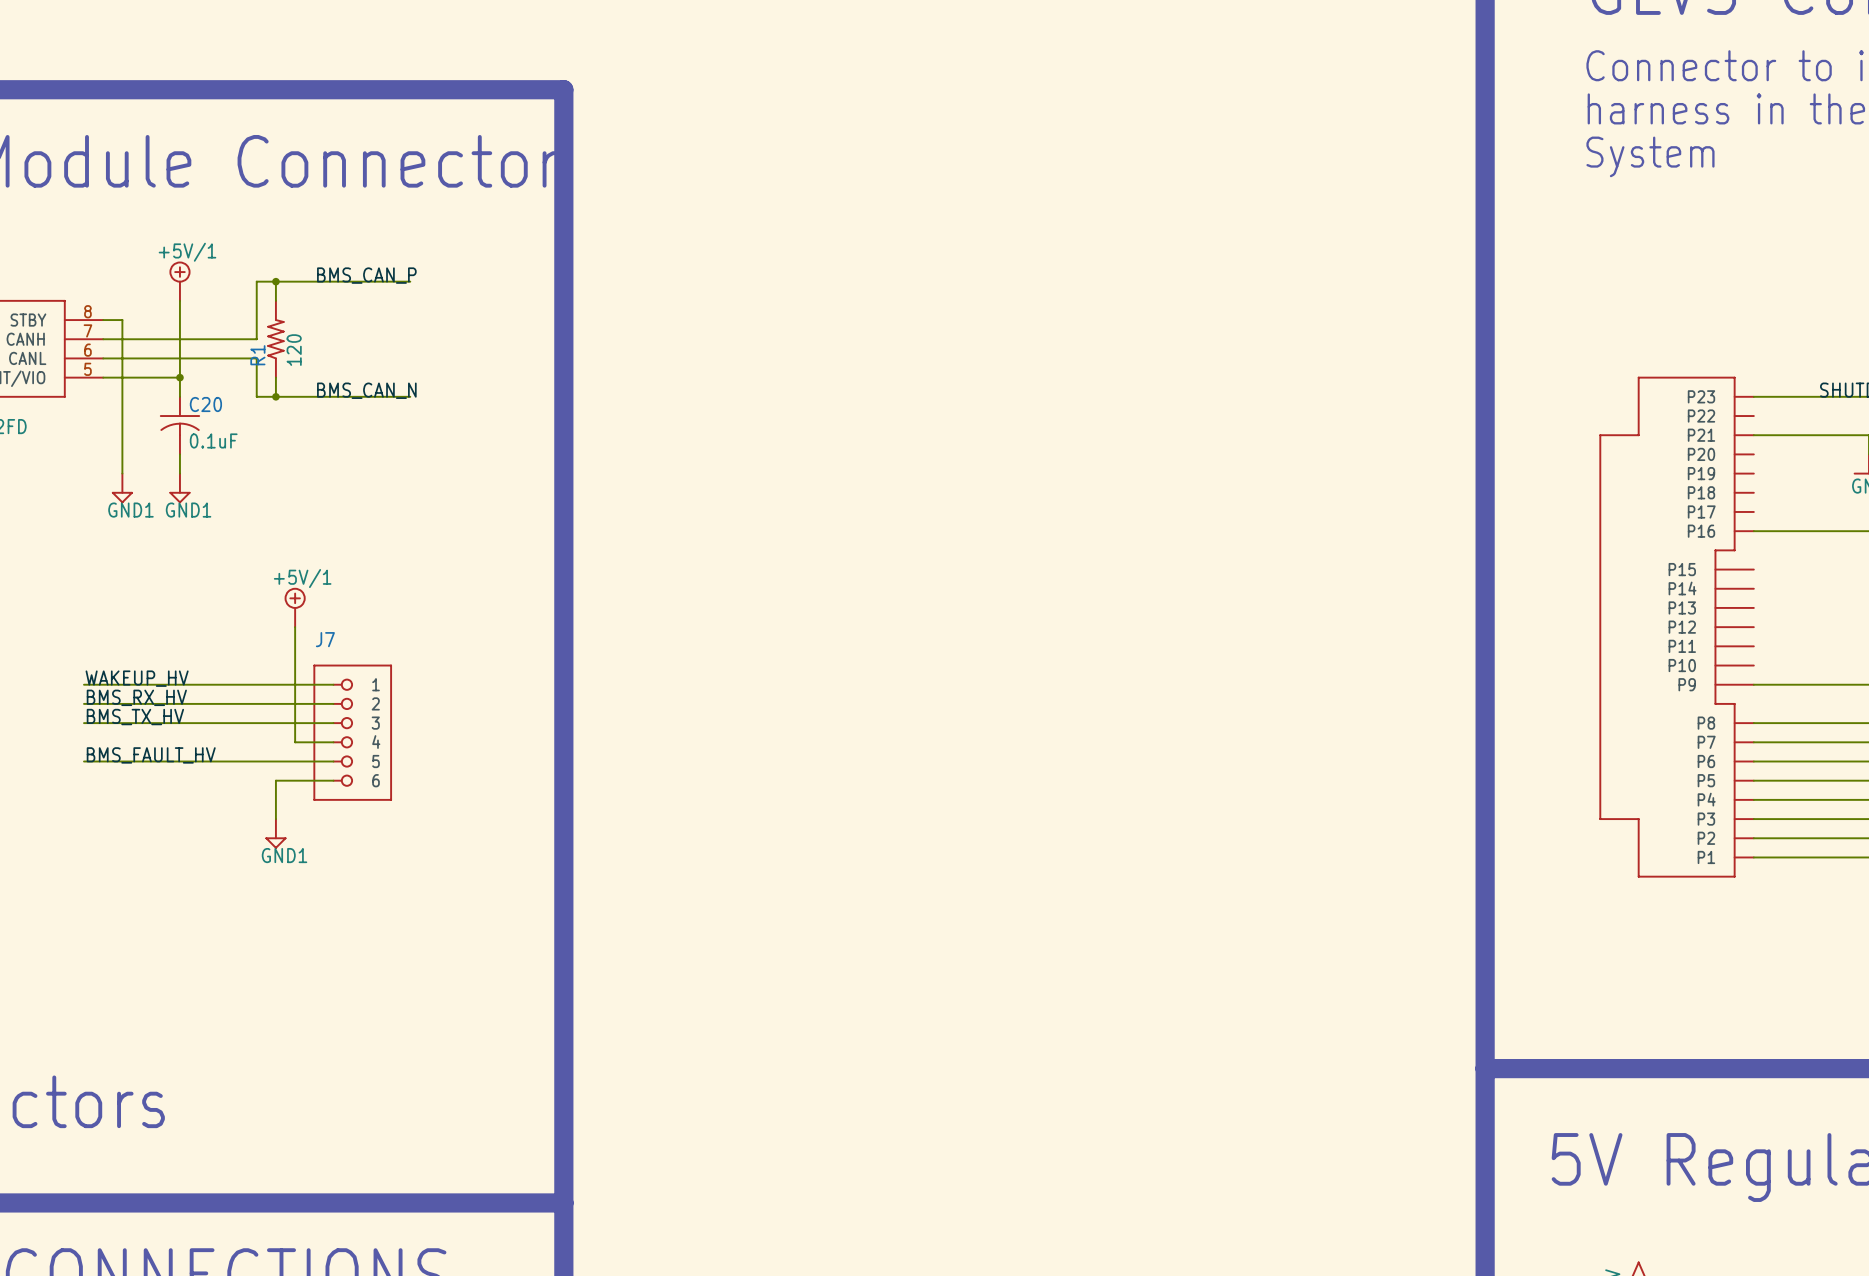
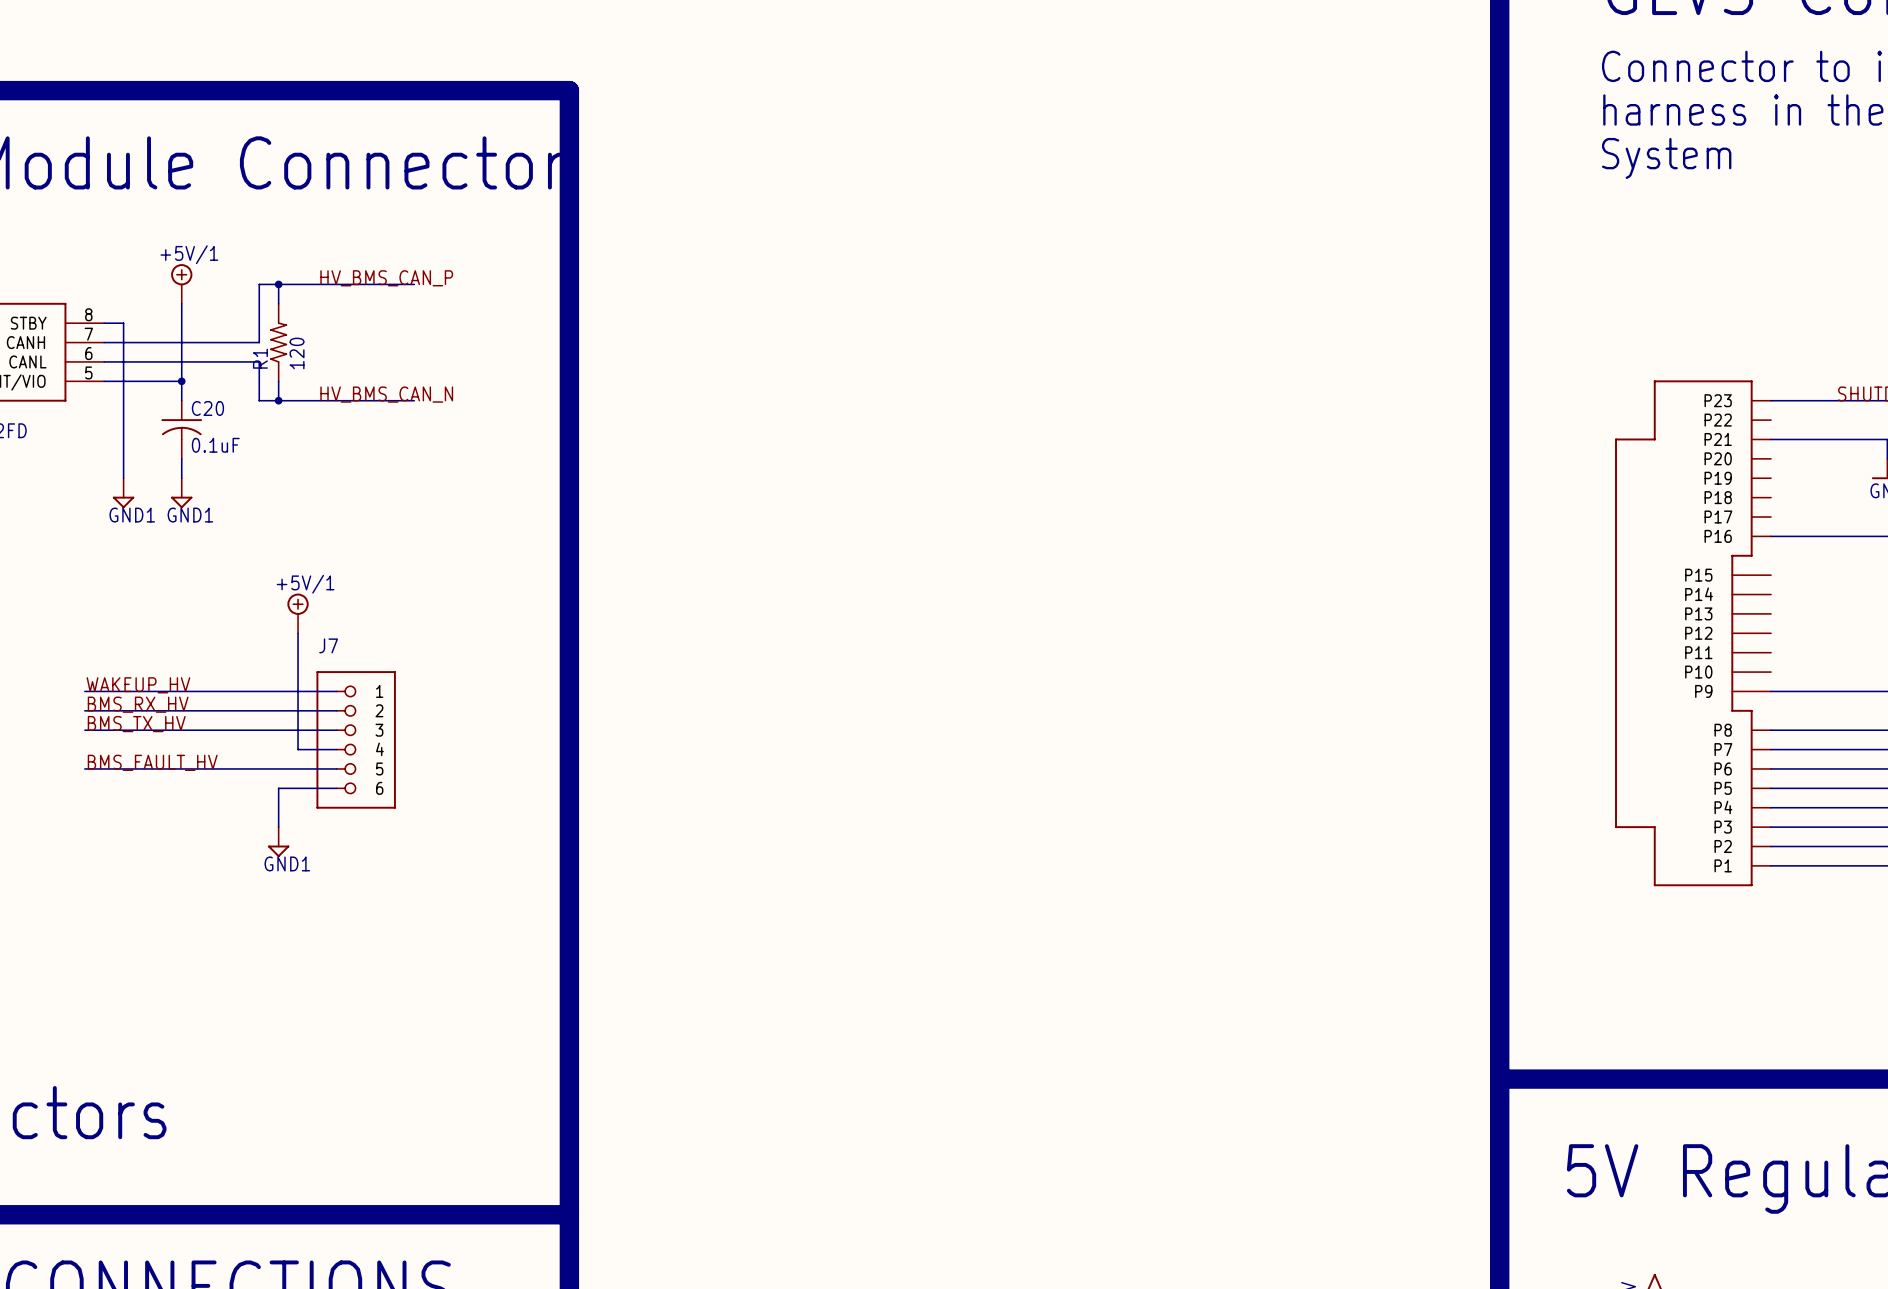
label: BMS_CAN_P (366, 275) -> HV_BMS_CAN_P (386, 278)
label: BMS_CAN_N (366, 390) -> HV_BMS_CAN_N (386, 394)

